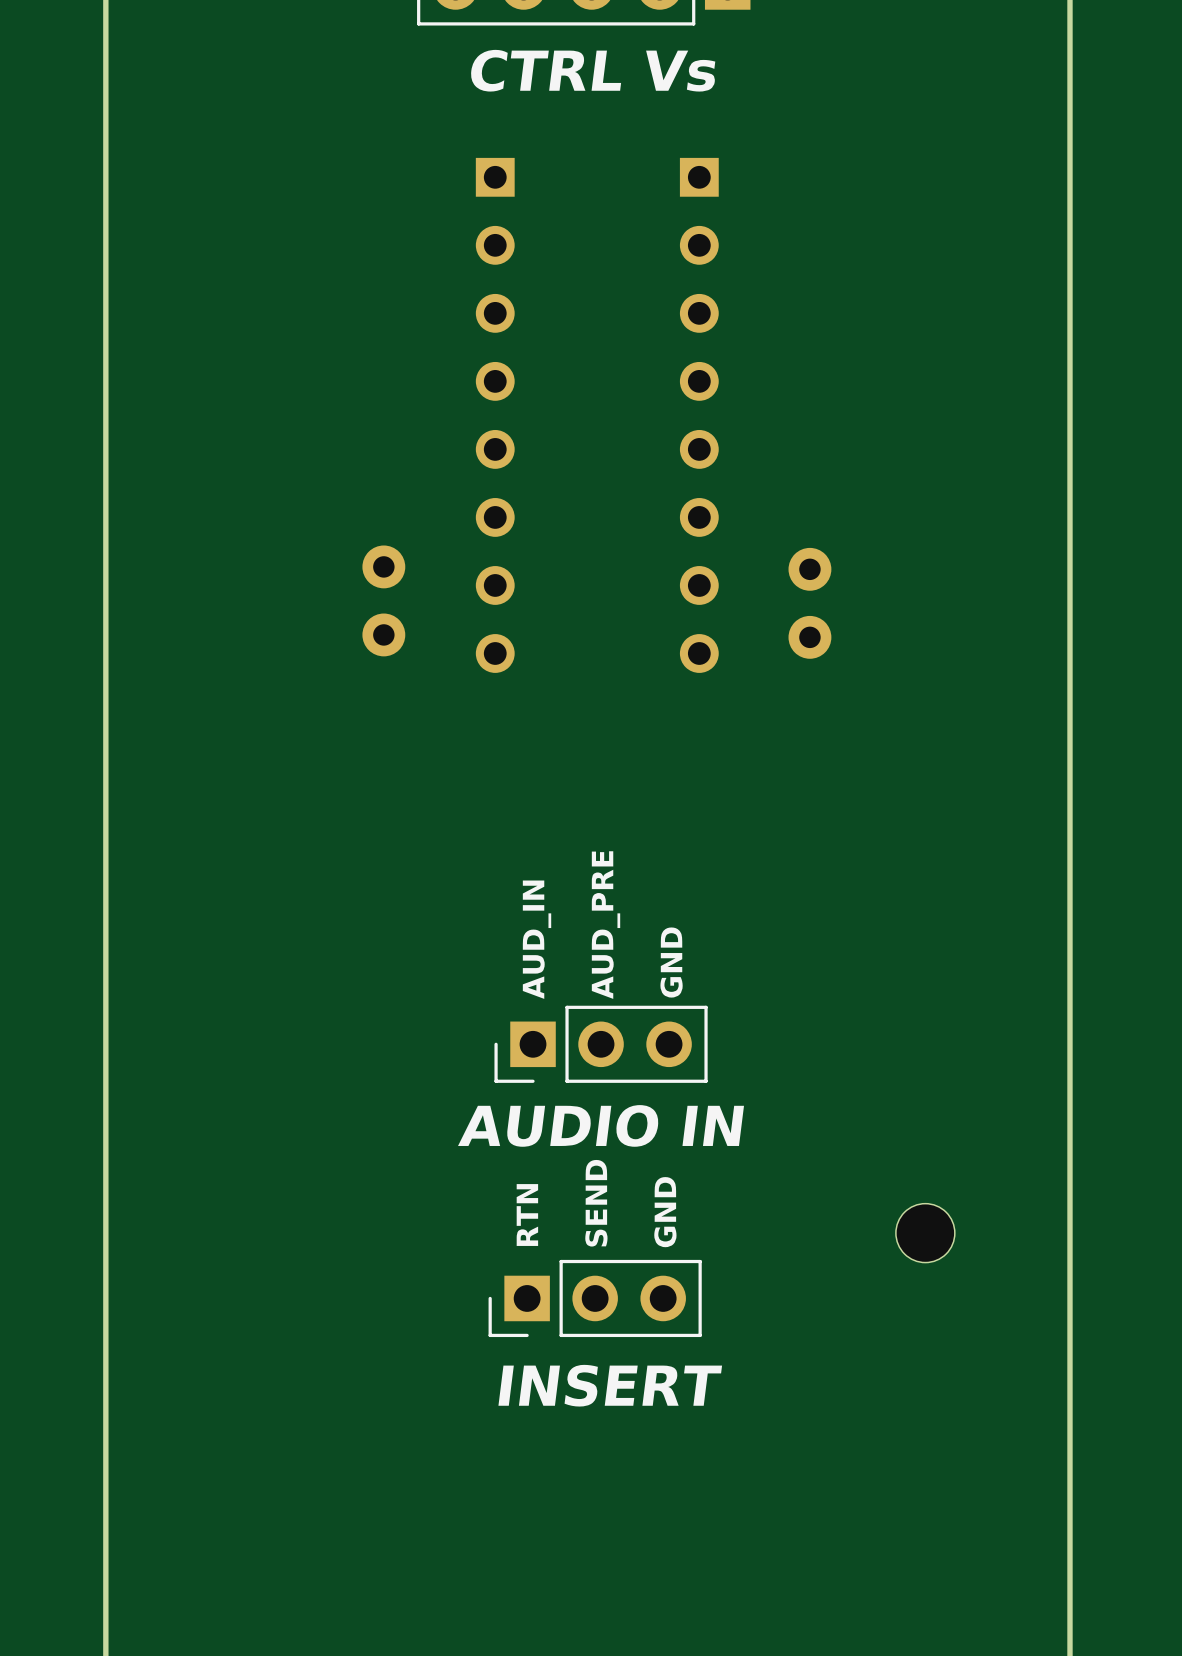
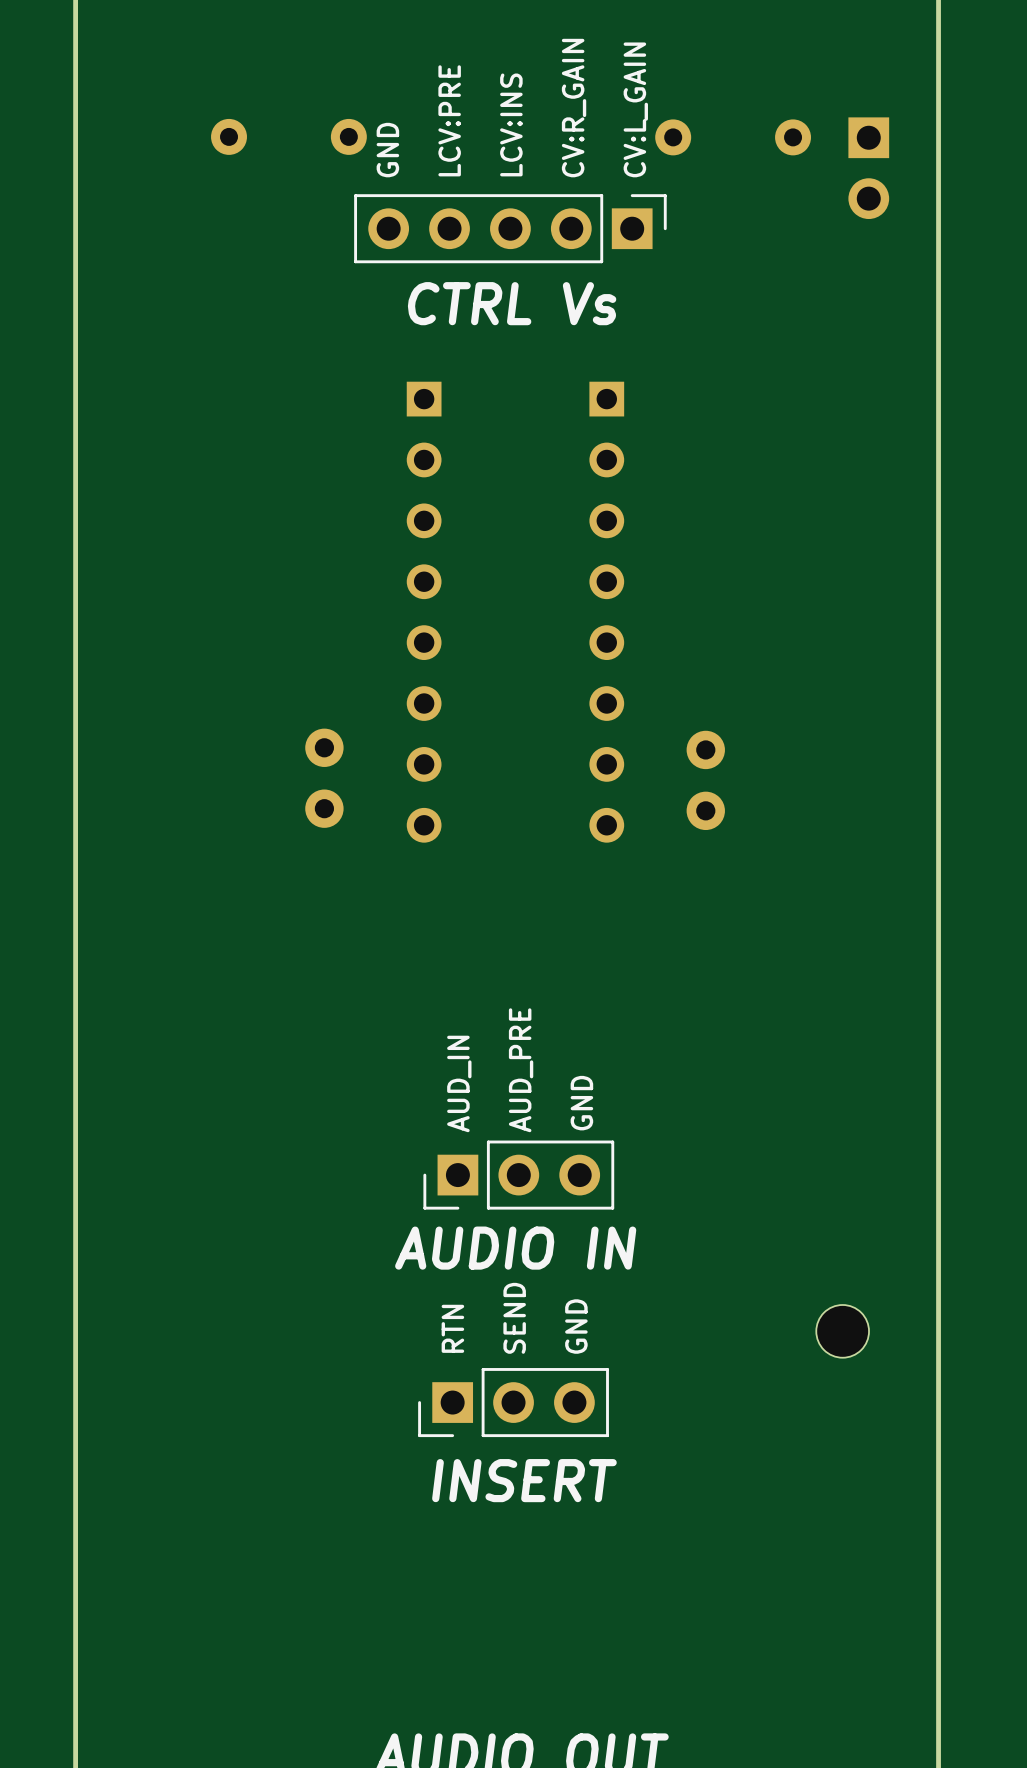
part position: (925, 1233) -> (842, 1331)

